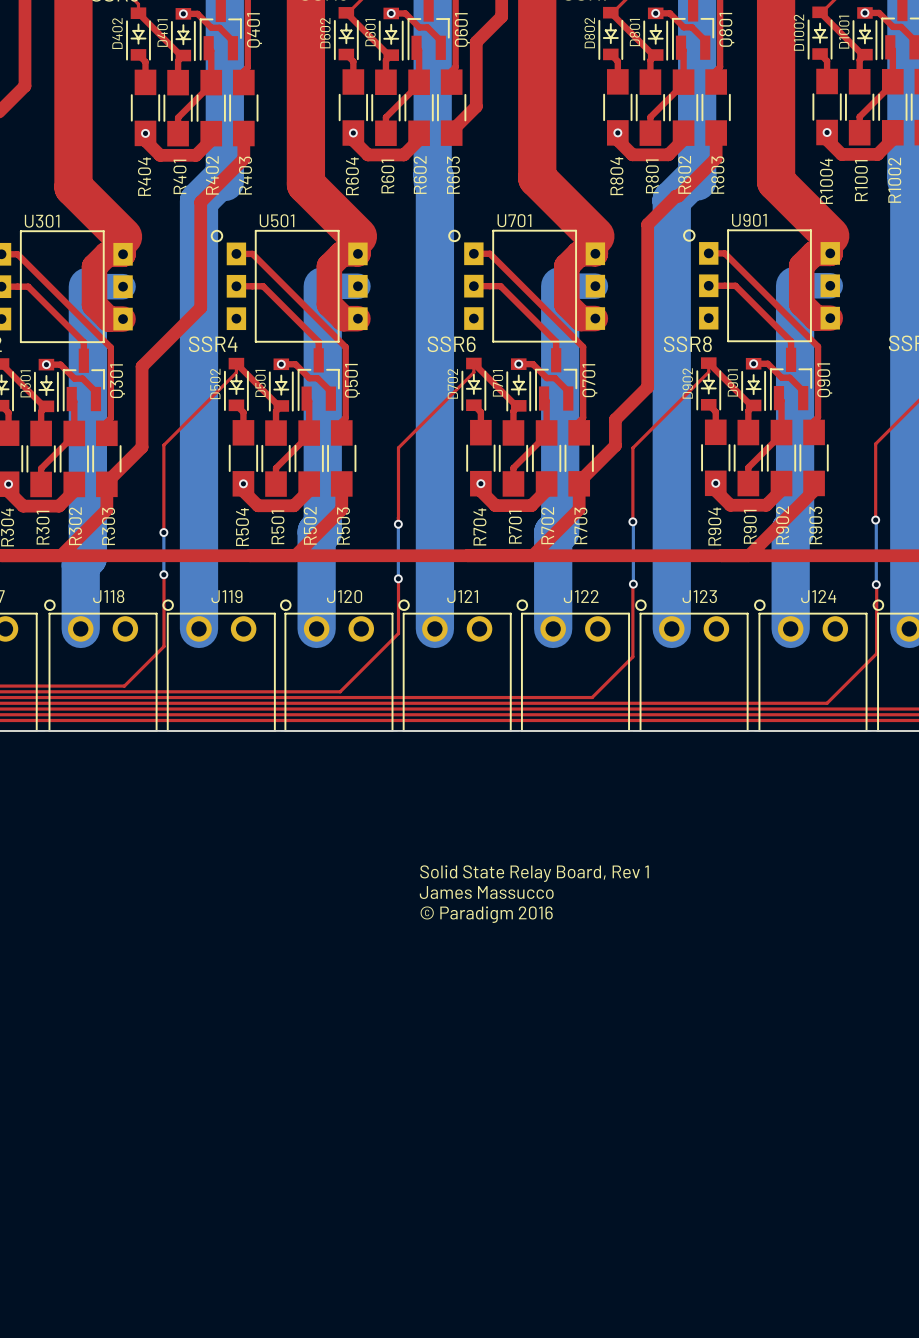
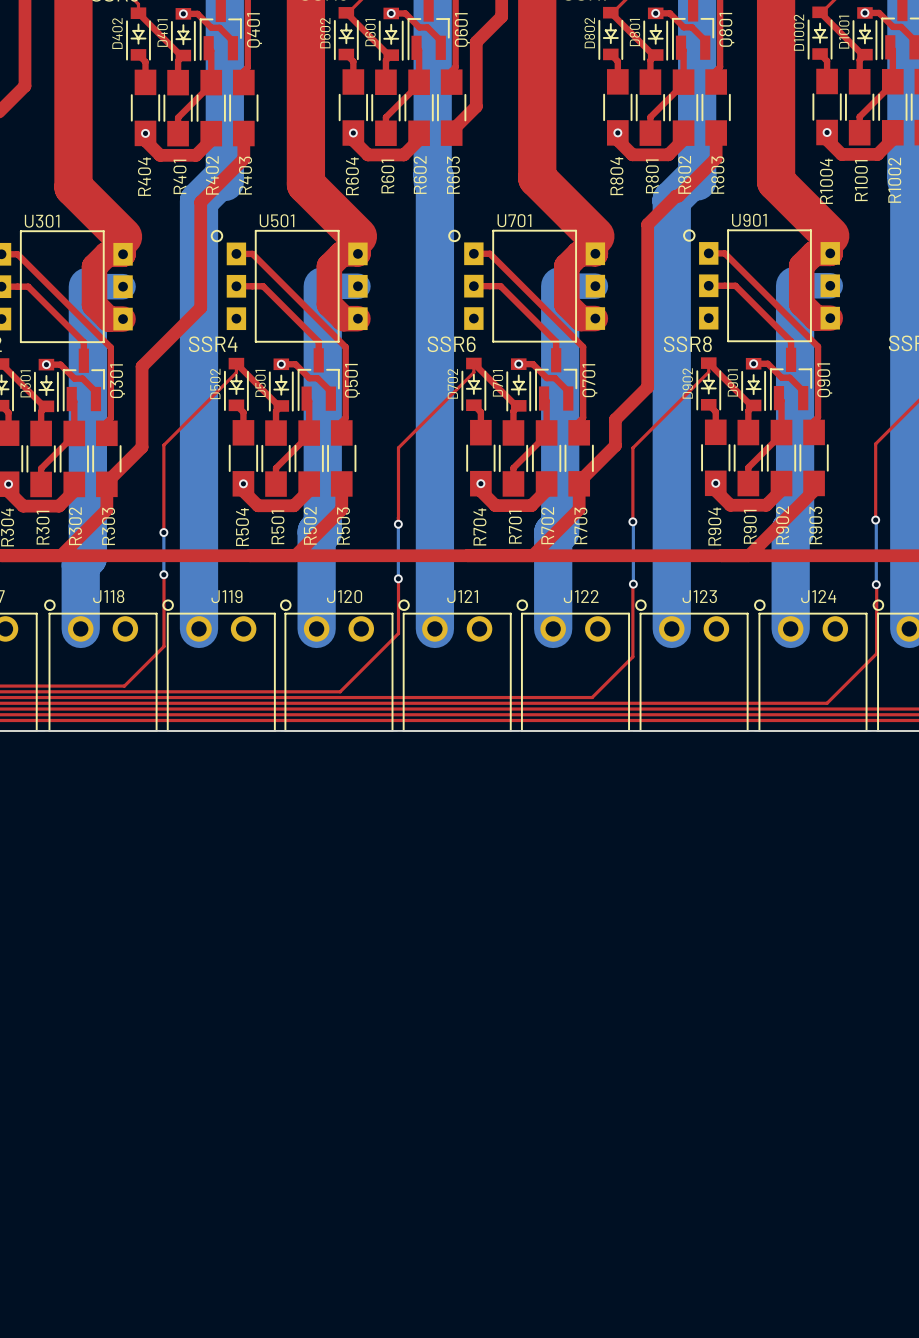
text: Solid State Relay Board, Rev 1 (534, 873) -> none
text: James Massucco (486, 892) -> none
text: © Paradigm 2016 (486, 914) -> none

